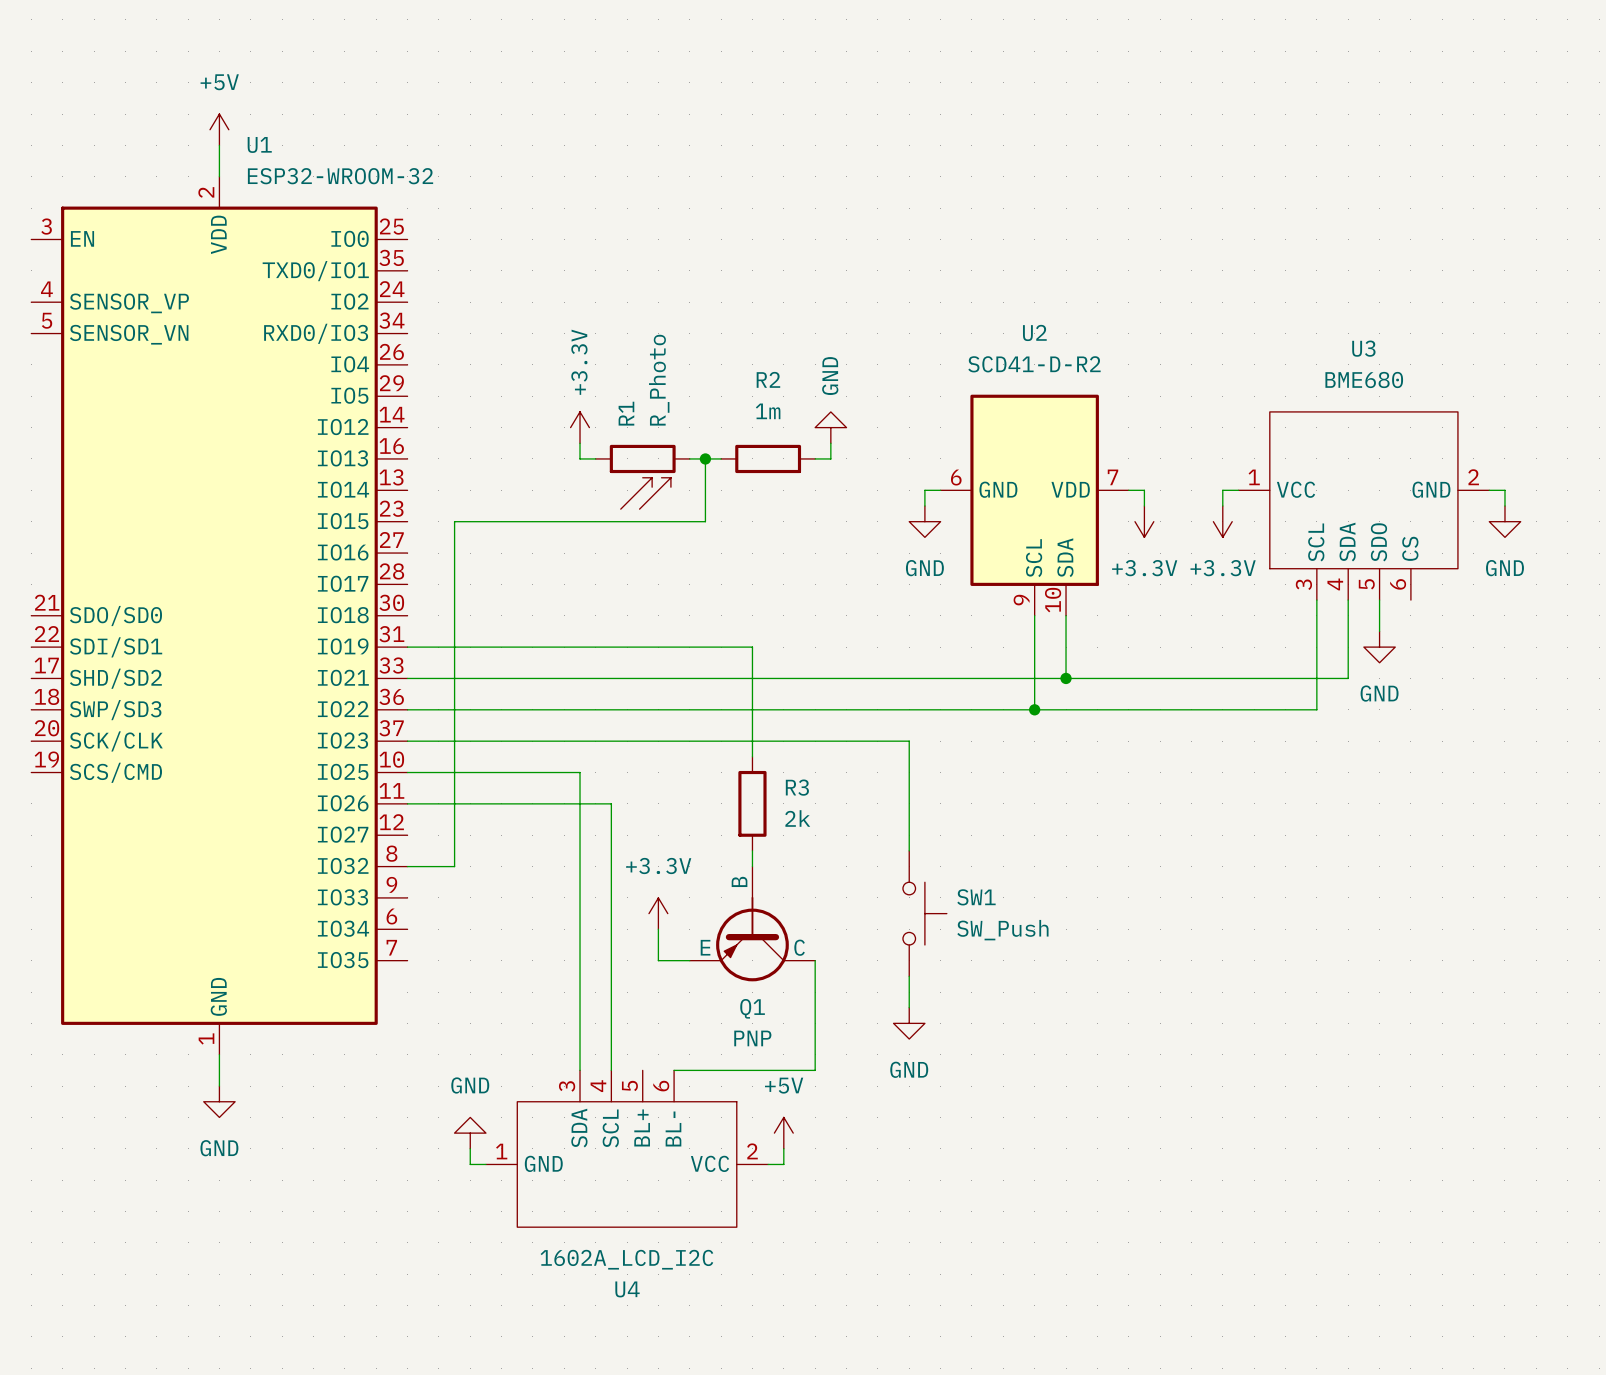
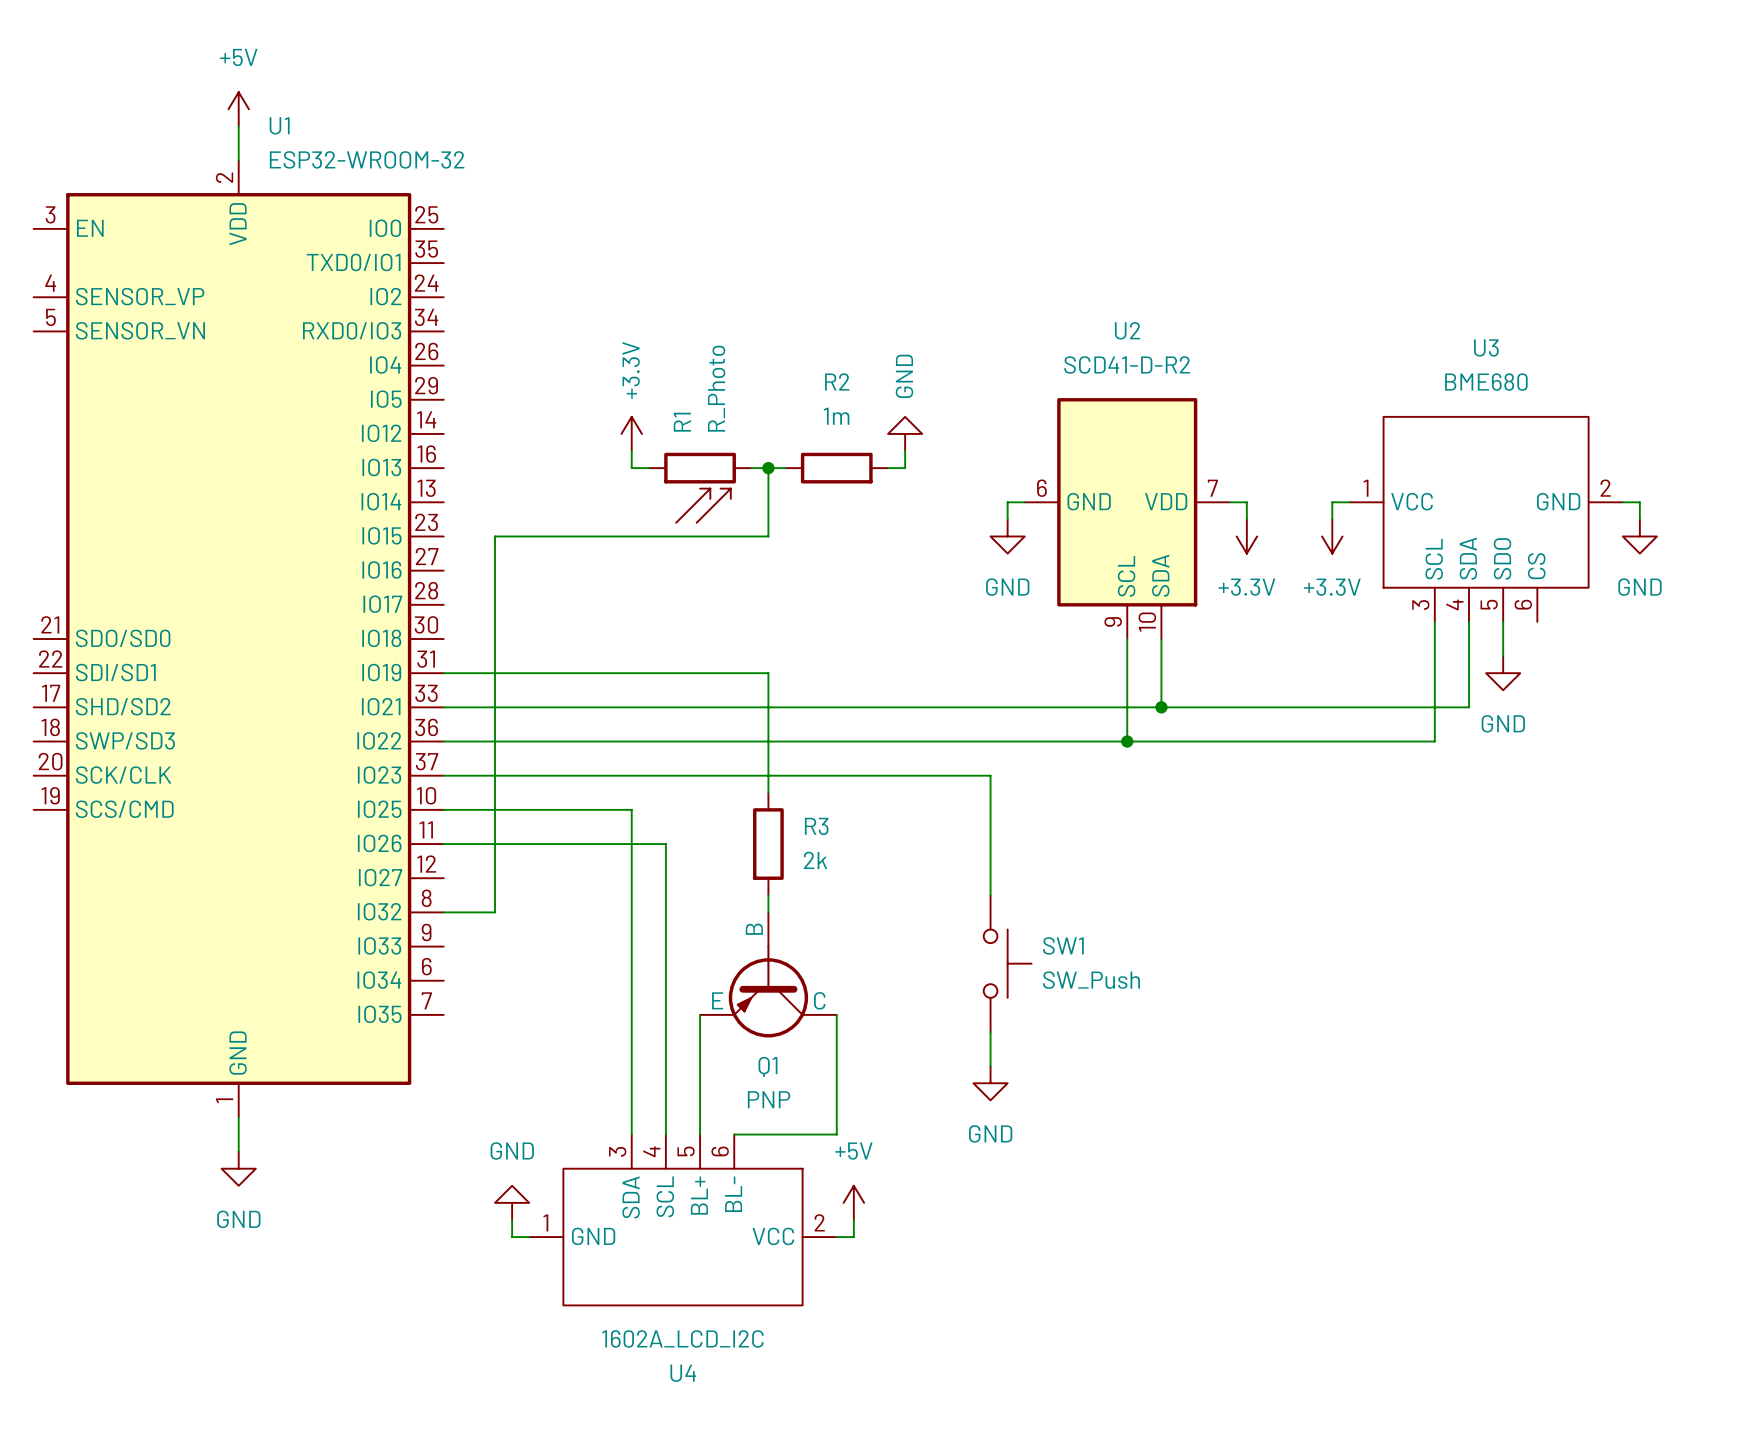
wire: (705, 647) (752, 647) (752, 756) -> (768, 673) (768, 792)
R3 position: (752, 803) -> (768, 844)
wire: (752, 850) (752, 866) -> (768, 895) (768, 912)
power symbol: +3.3V (658, 913) -> none
Q1 position: (752, 923) -> (768, 974)
wire: (658, 929) (658, 960) (689, 960) -> none
wire: none -> (700, 1014) (700, 1134)
wire: (815, 960) (815, 1070) (768, 1070) -> (836, 1014) (836, 1134)

